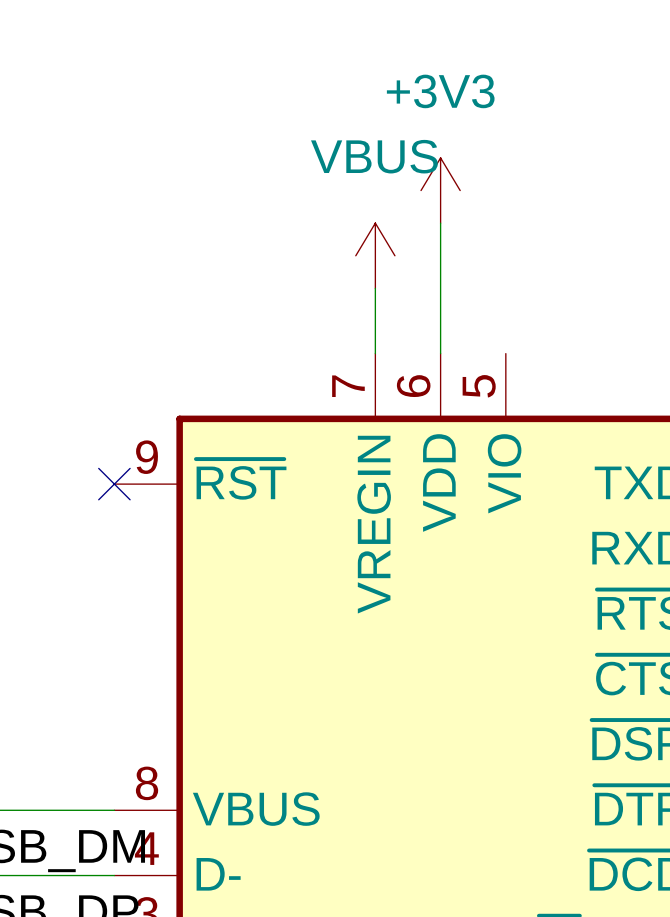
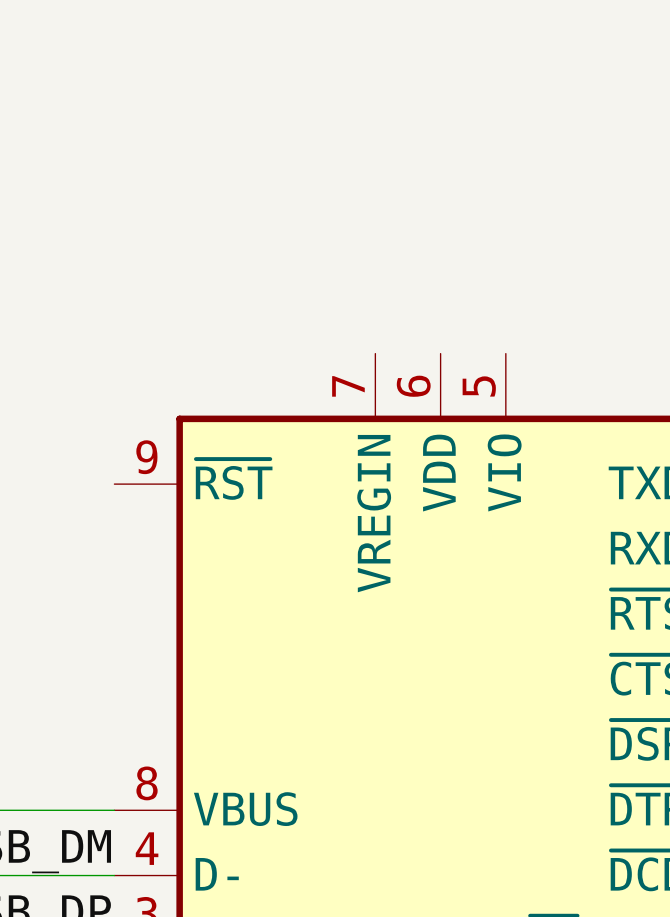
power symbol: +3V3 (440, 190) -> none
wire: (440, 223) (440, 353) -> none
power symbol: VBUS (375, 255) -> none
wire: (375, 288) (375, 353) -> none
no-connect mark: (114, 484) -> none

